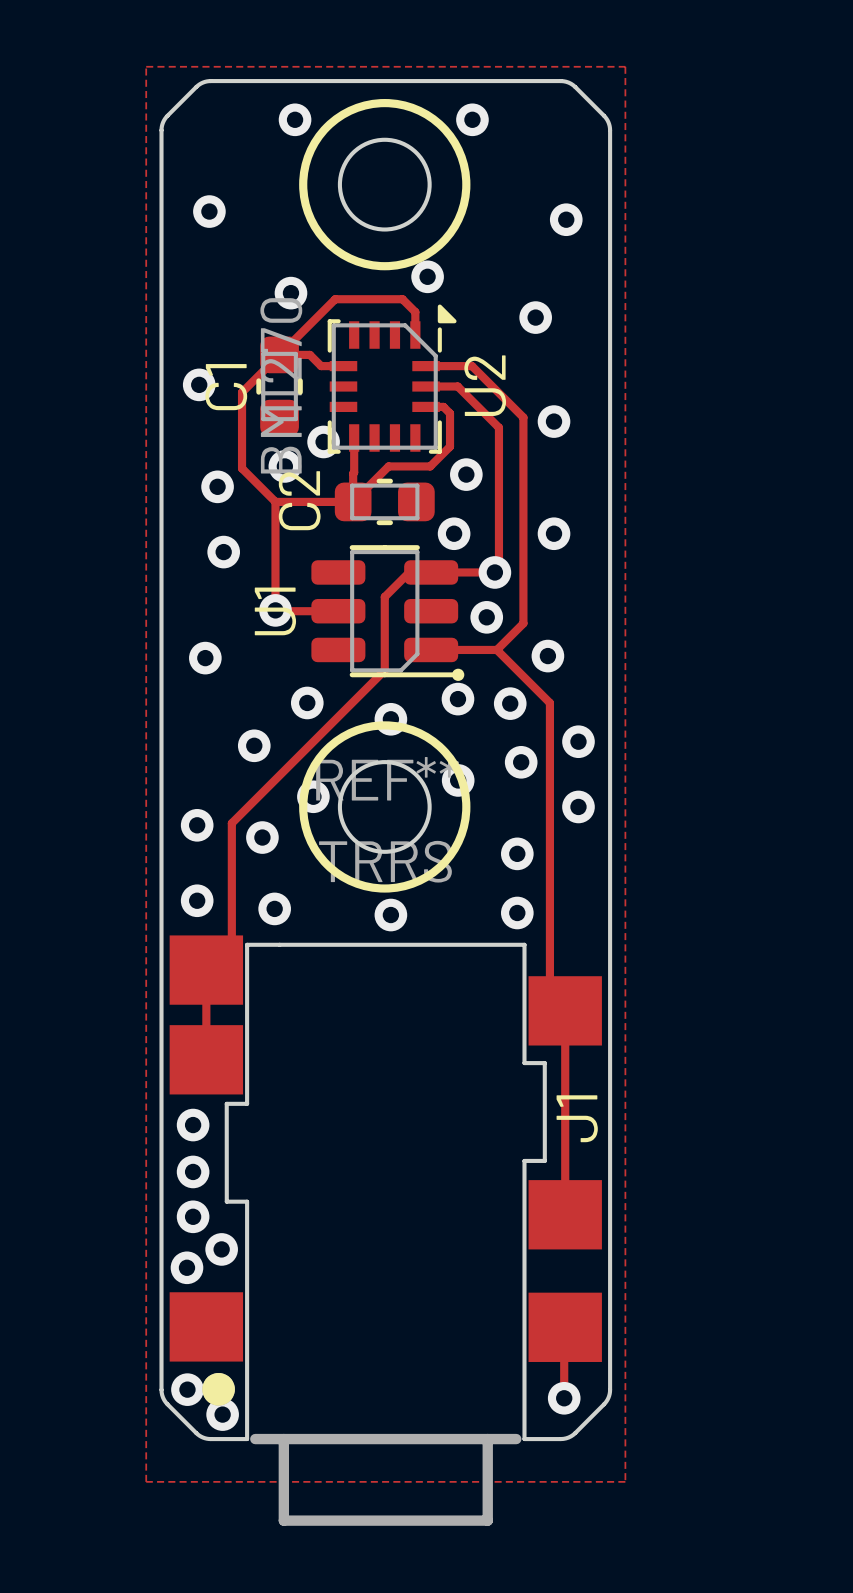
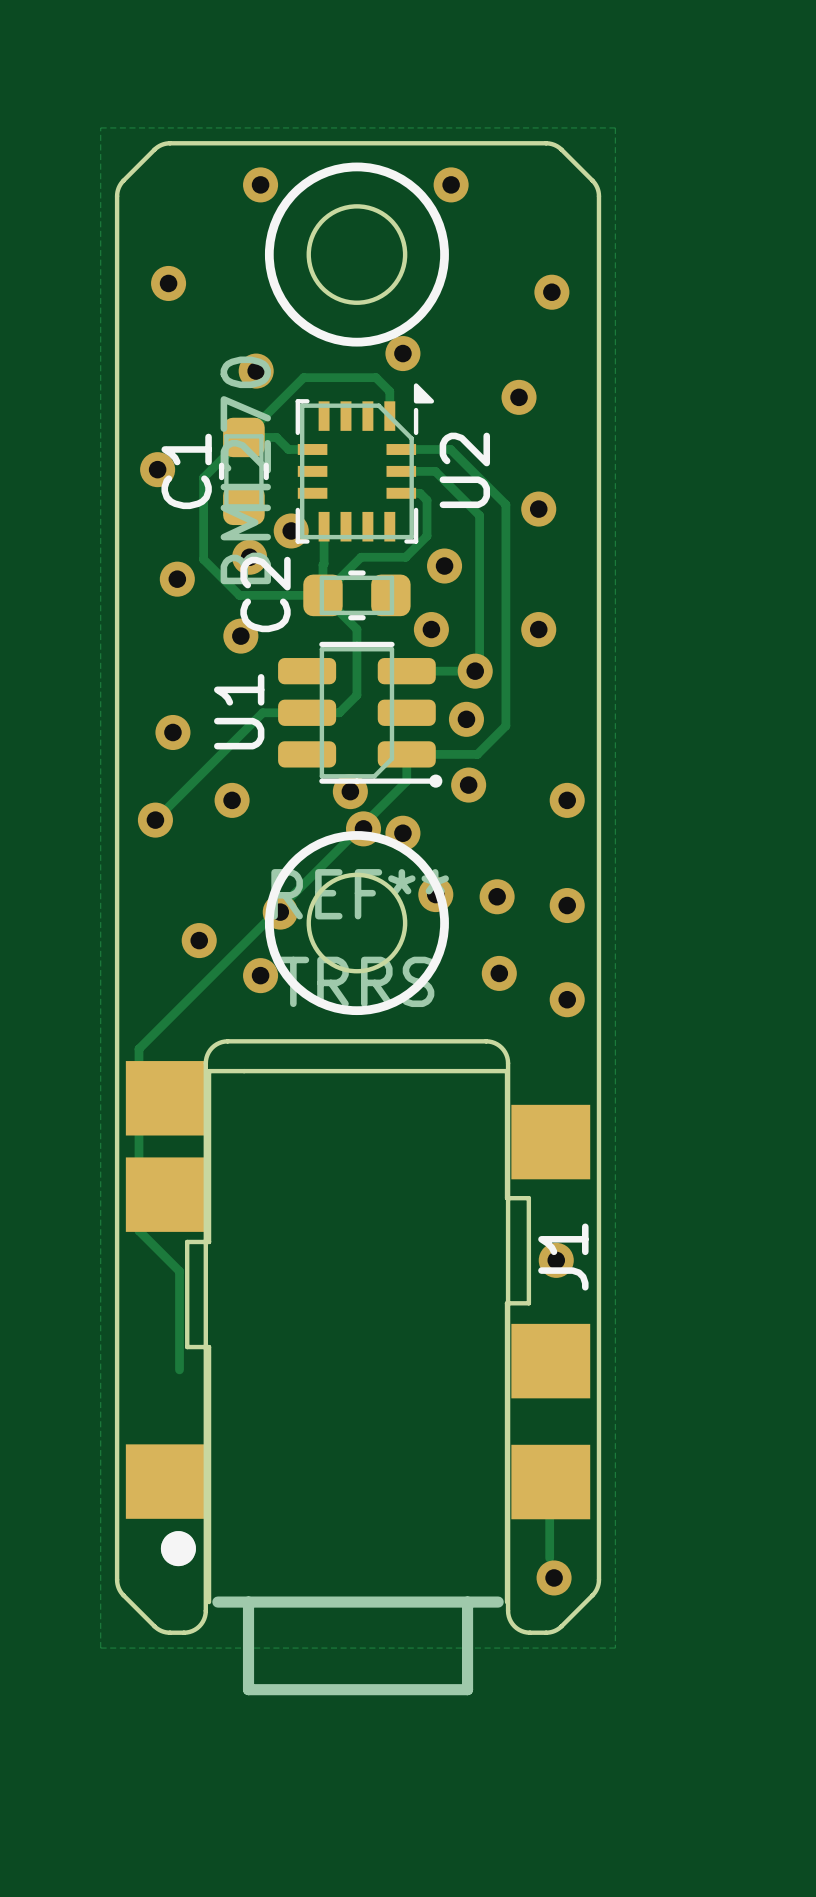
track: (275, 501) (275, 610) (297, 611) -> (155, 820) (262, 712)
track: none -> (322, 595) (356, 629) (356, 695) (339, 712) (307, 712)
via: none -> (240, 636)
via: (223, 552) -> none
track: (431, 572) (409, 572) (384, 596) (384, 670) (231, 823) (231, 944) (206, 970) (206, 1059) -> none
via: (275, 610) -> none
track: none -> (406, 754) (406, 781) (139, 1048) (139, 1230) (179, 1271) (179, 1369)
track: (496, 649) (549, 702) (549, 995) (565, 1010) (565, 1214) -> none
via: (547, 656) -> none
via position: (205, 658) -> (172, 732)
via: none -> (468, 785)
via: none -> (350, 791)
via: none -> (232, 800)
via: none -> (567, 800)
via: (457, 699) -> none
via: (307, 702) -> none
via: (510, 703) -> none
via: none -> (155, 820)
via: none -> (402, 833)
via: (578, 741) -> none
via: (254, 745) -> none
via position: (521, 762) -> (497, 896)
via position: (578, 806) -> (567, 905)
via: none -> (199, 940)
via: (197, 825) -> none
via: (262, 837) -> none
via: none -> (260, 975)
via: none -> (567, 999)
via: (197, 900) -> none
via: (274, 908) -> none
via: (517, 912) -> none
via: (390, 915) -> none
via: none -> (556, 1260)
via: (193, 1125) -> none
via: (193, 1171) -> none
via: (193, 1216) -> none
via: (221, 1249) -> none
via: (186, 1267) -> none
board edge: (161, 1389) (165, 1402) (201, 1436) (208, 1438) (247, 1439) -> (117, 1549) (117, 1581) (119, 1590) (154, 1626) (165, 1632) (183, 1632) (192, 1631) (199, 1626) (204, 1619) (205, 1610) (205, 1063) (207, 1054) (212, 1047) (219, 1042) (227, 1041) (486, 1041) (497, 1044) (503, 1049) (508, 1063) (508, 1610) (509, 1619) (514, 1626) (521, 1631) (529, 1632) (550, 1632) (561, 1626) (596, 1590) (598, 1581) (598, 1549)
via: (187, 1389) -> none
board edge: (610, 1389) (605, 1402) (571, 1436) (560, 1439) (524, 1439) -> none
via position: (564, 1398) -> (554, 1577)
via: (222, 1414) -> none

